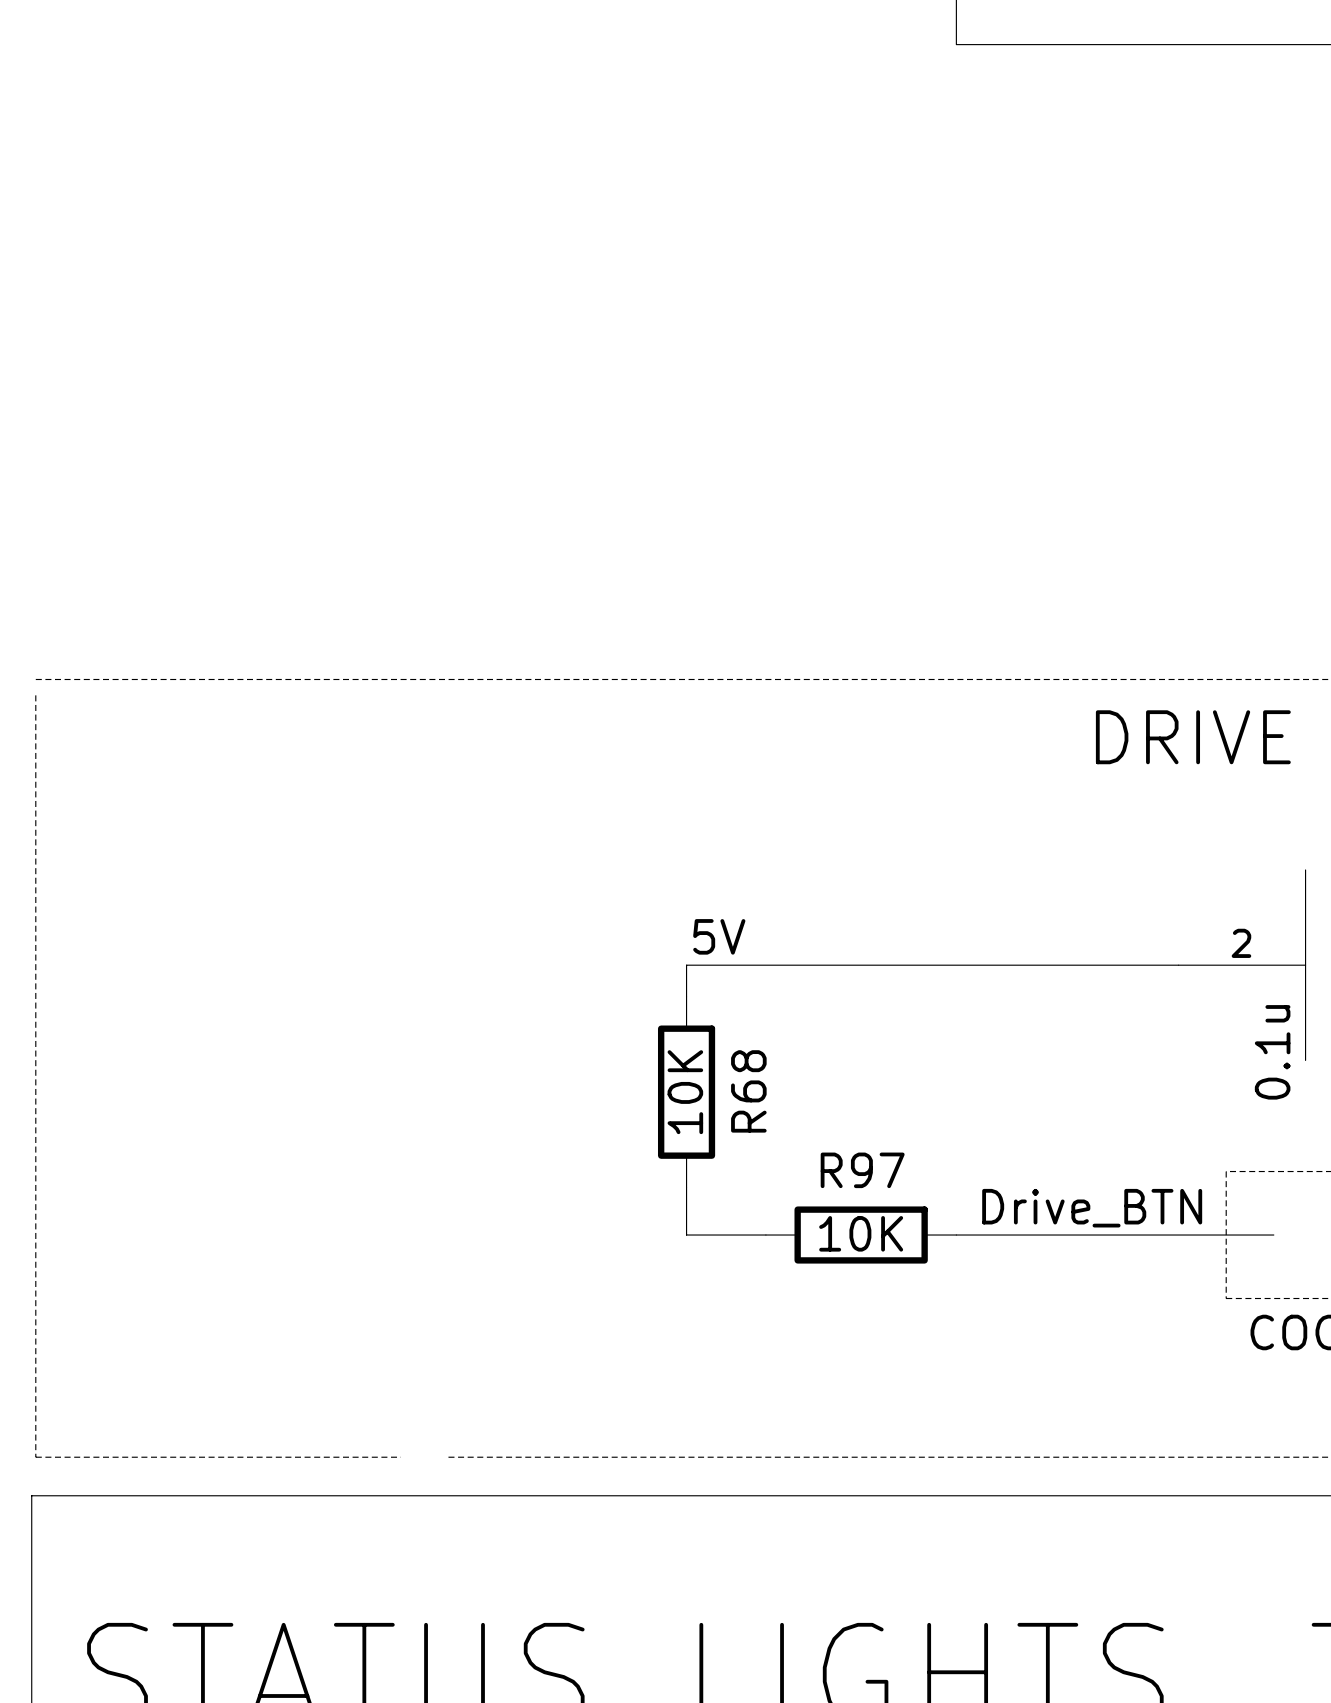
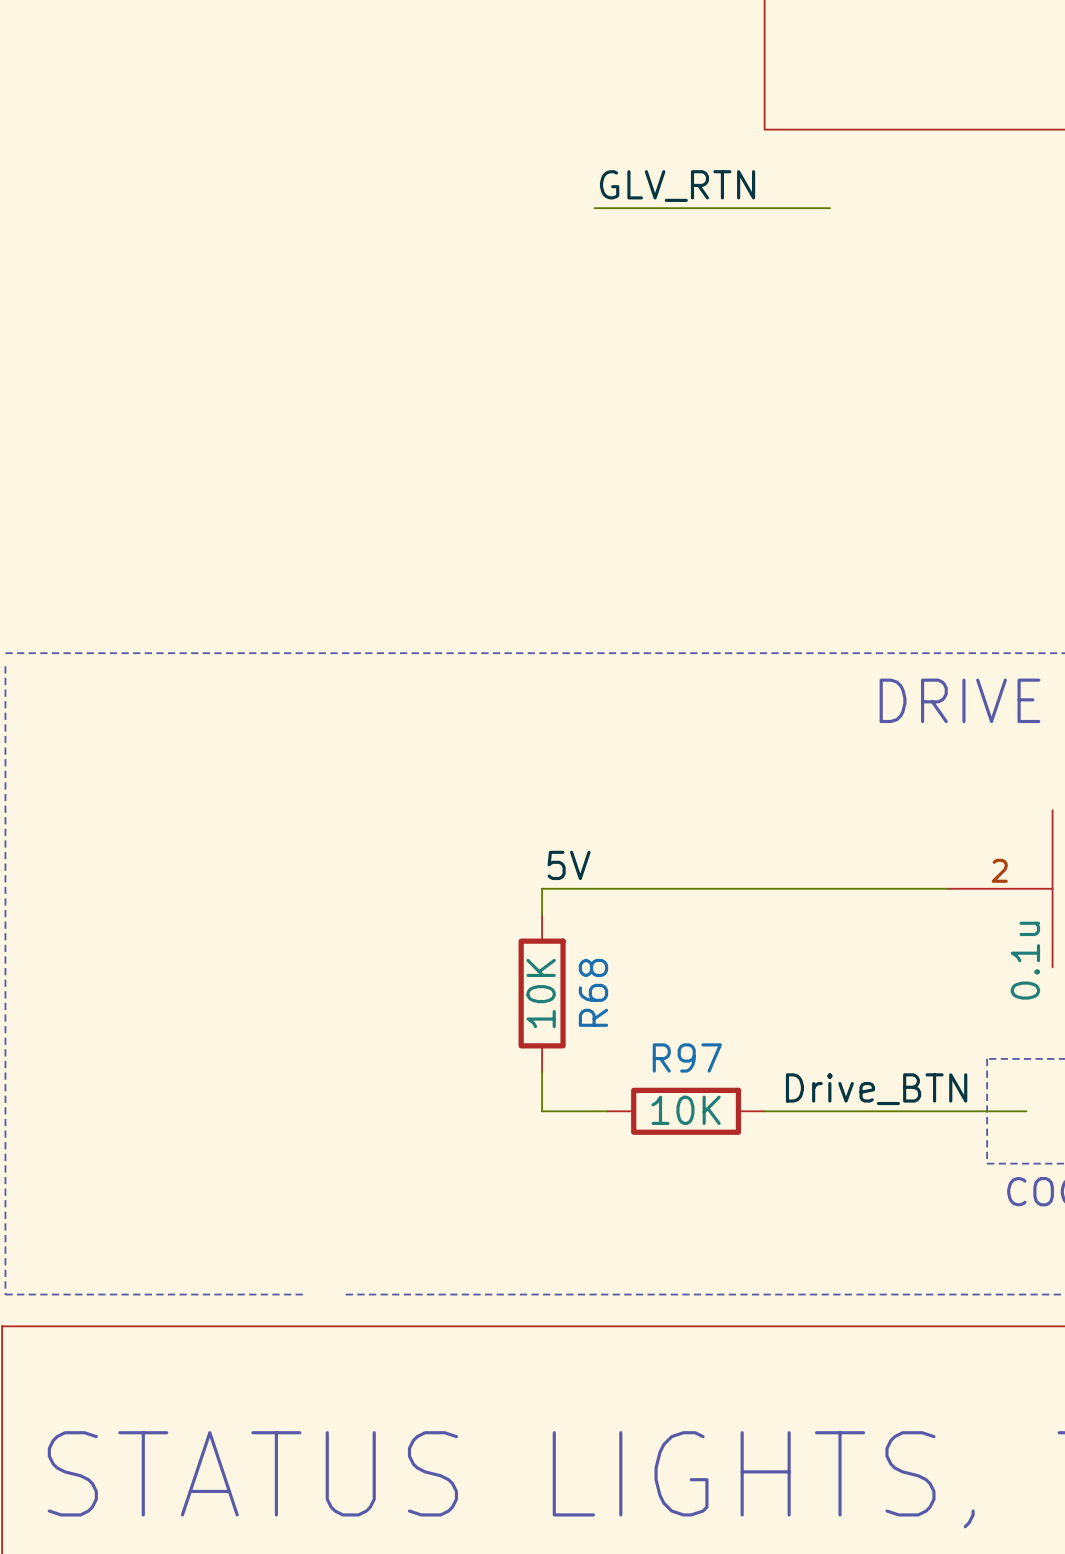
label: none -> GLV_RTN (677, 186)
wire: none -> (594, 208) (830, 208)

